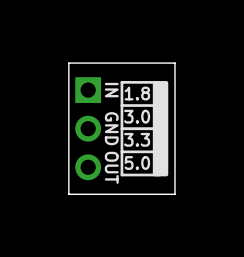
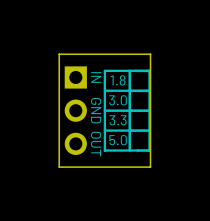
drawing: [152, 81, 169, 177] -> none
line: none -> (129, 70) (129, 150)
line: none -> (135, 70) (149, 70) (149, 150) (137, 150)
line: none -> (131, 90) (149, 90)
line: none -> (131, 110) (149, 110)
line: none -> (131, 130) (149, 130)

